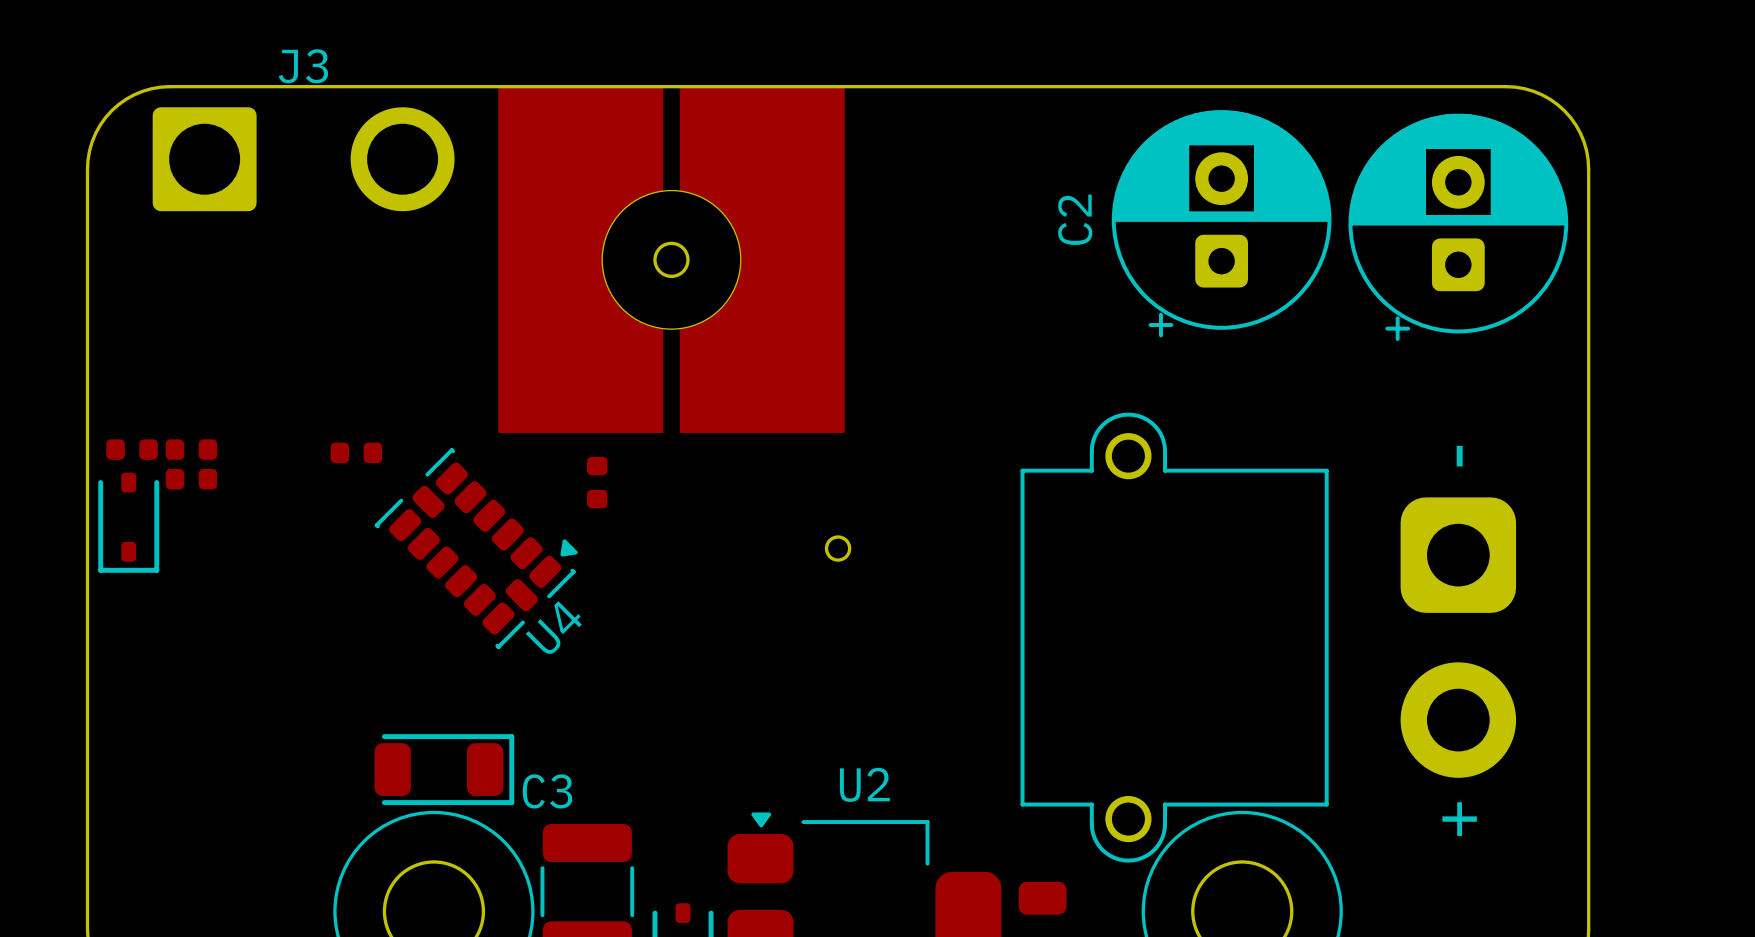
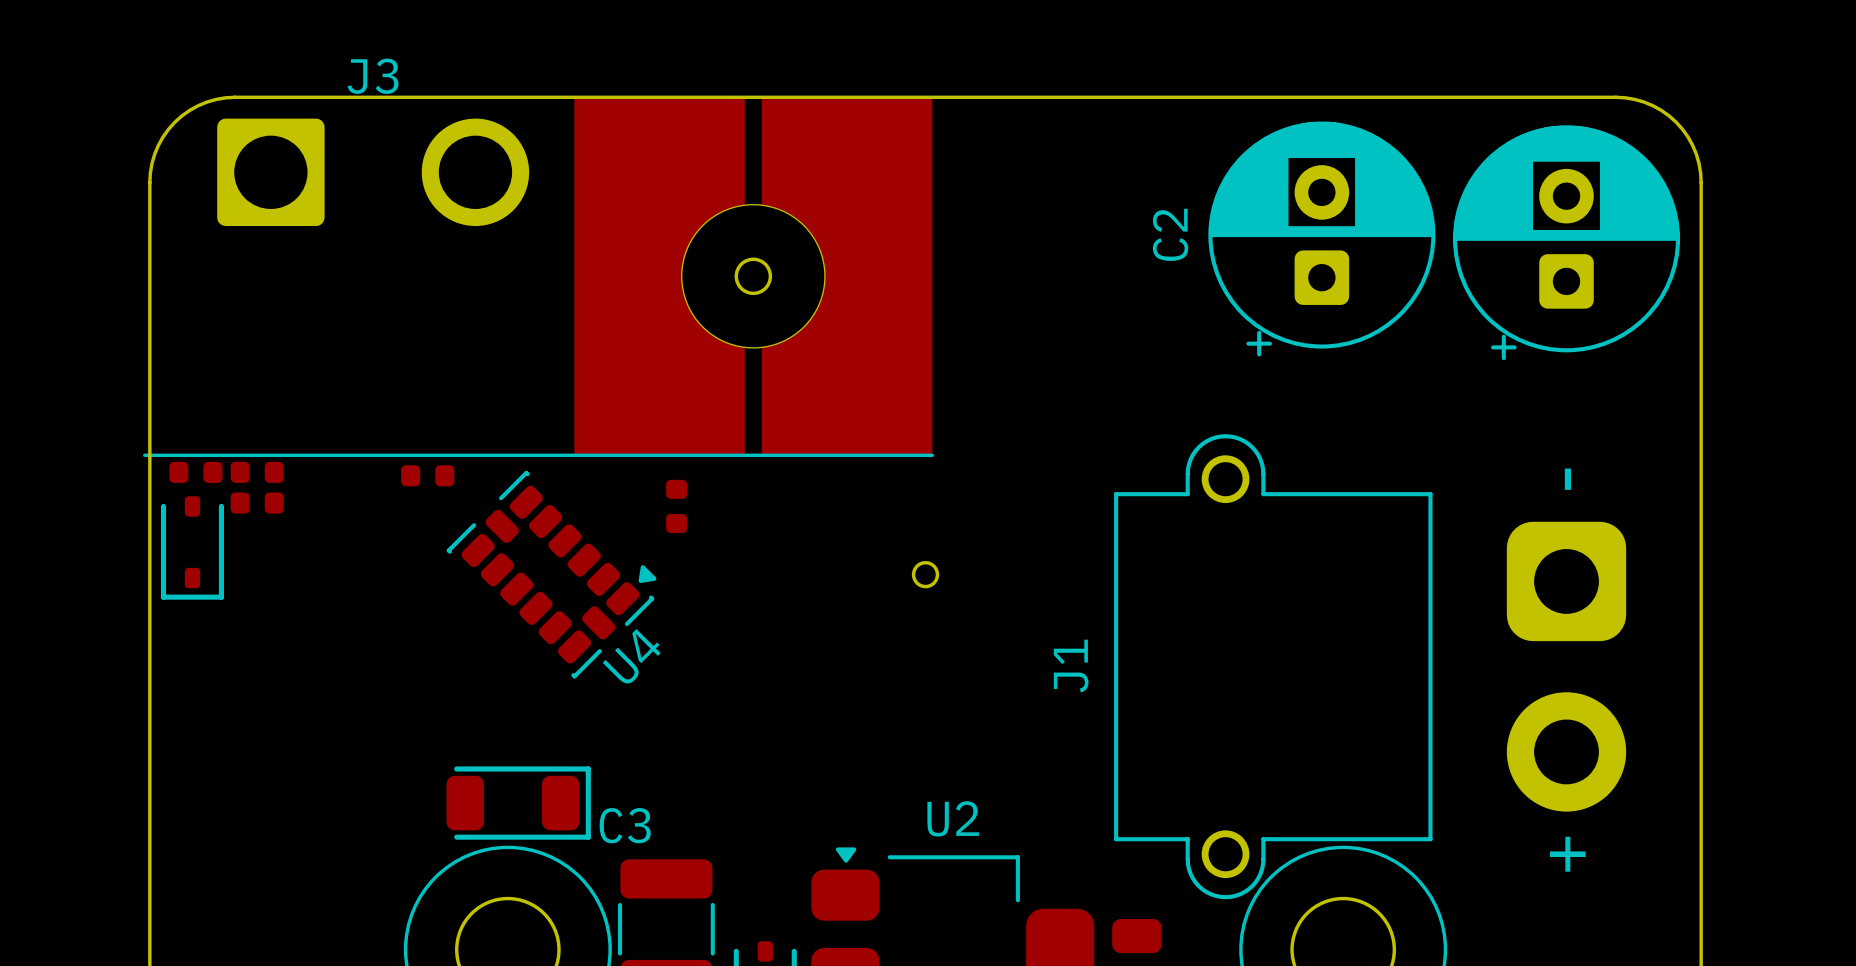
line: none -> (144, 455) (932, 455)
J1 name: none -> J1 (1071, 666)

